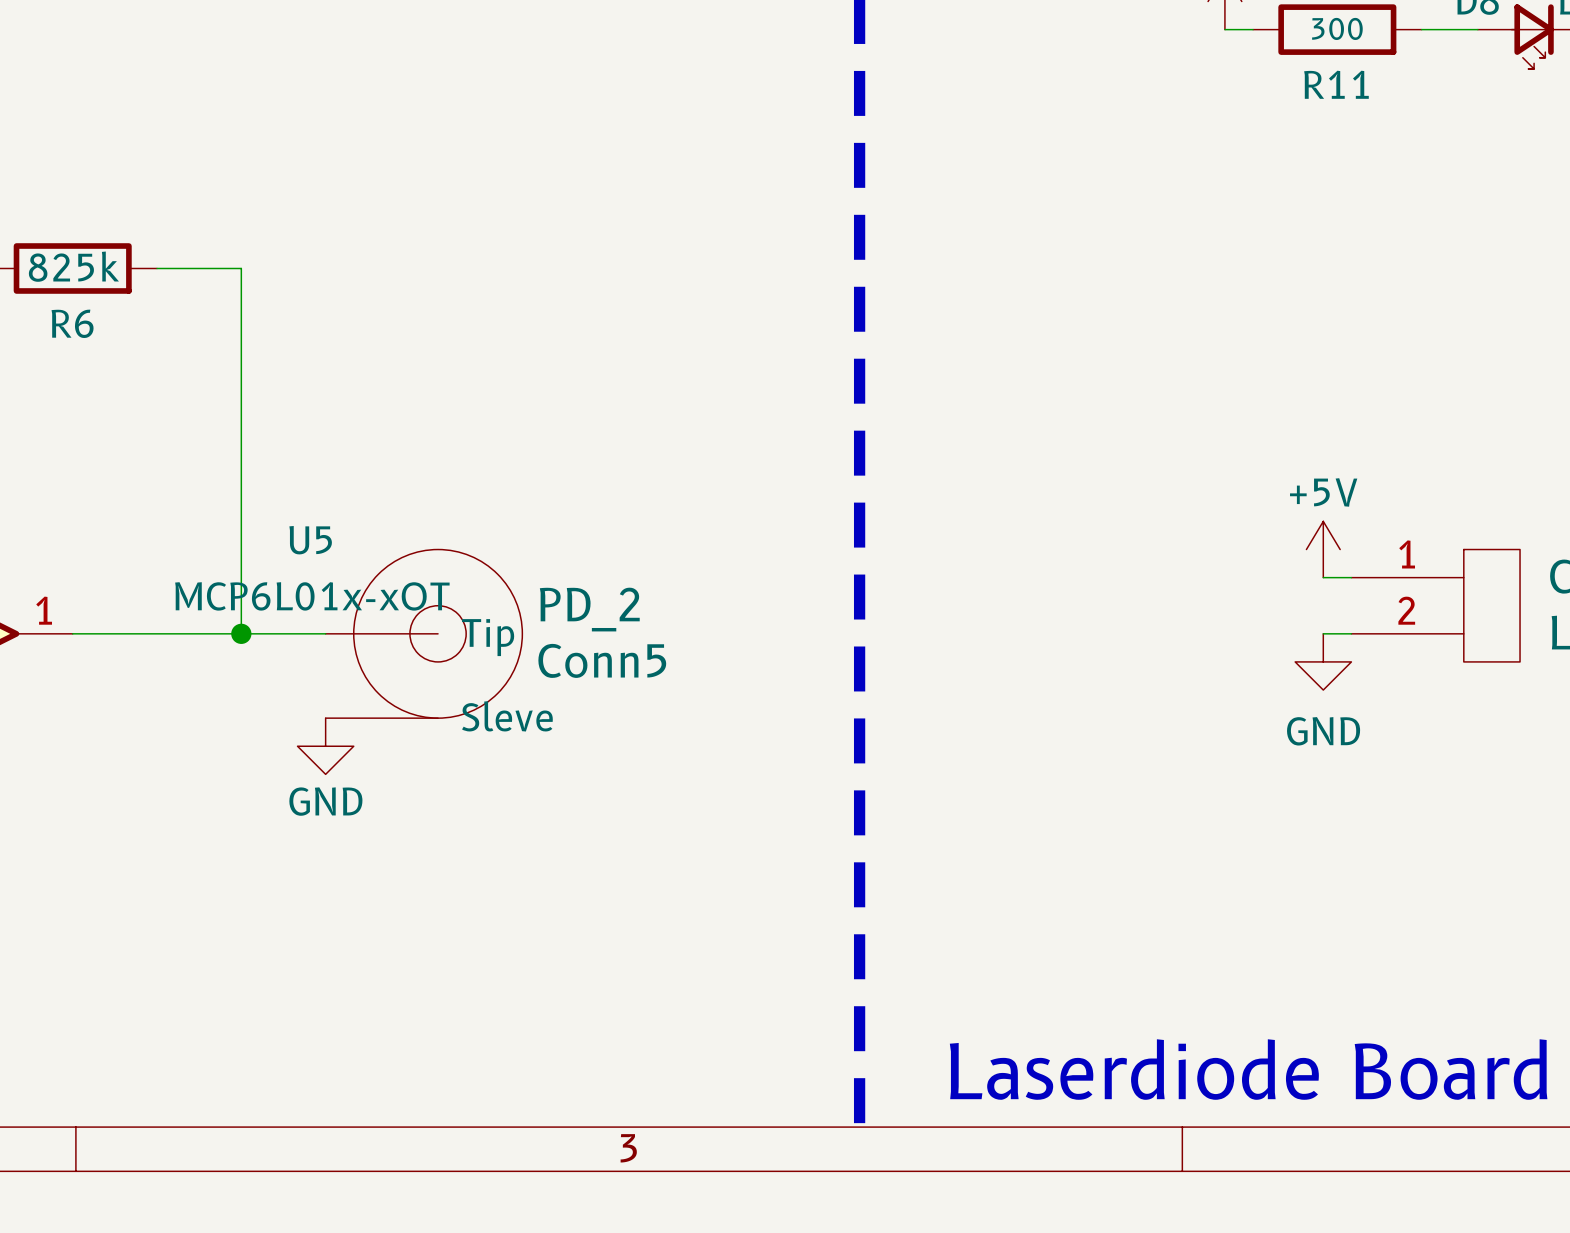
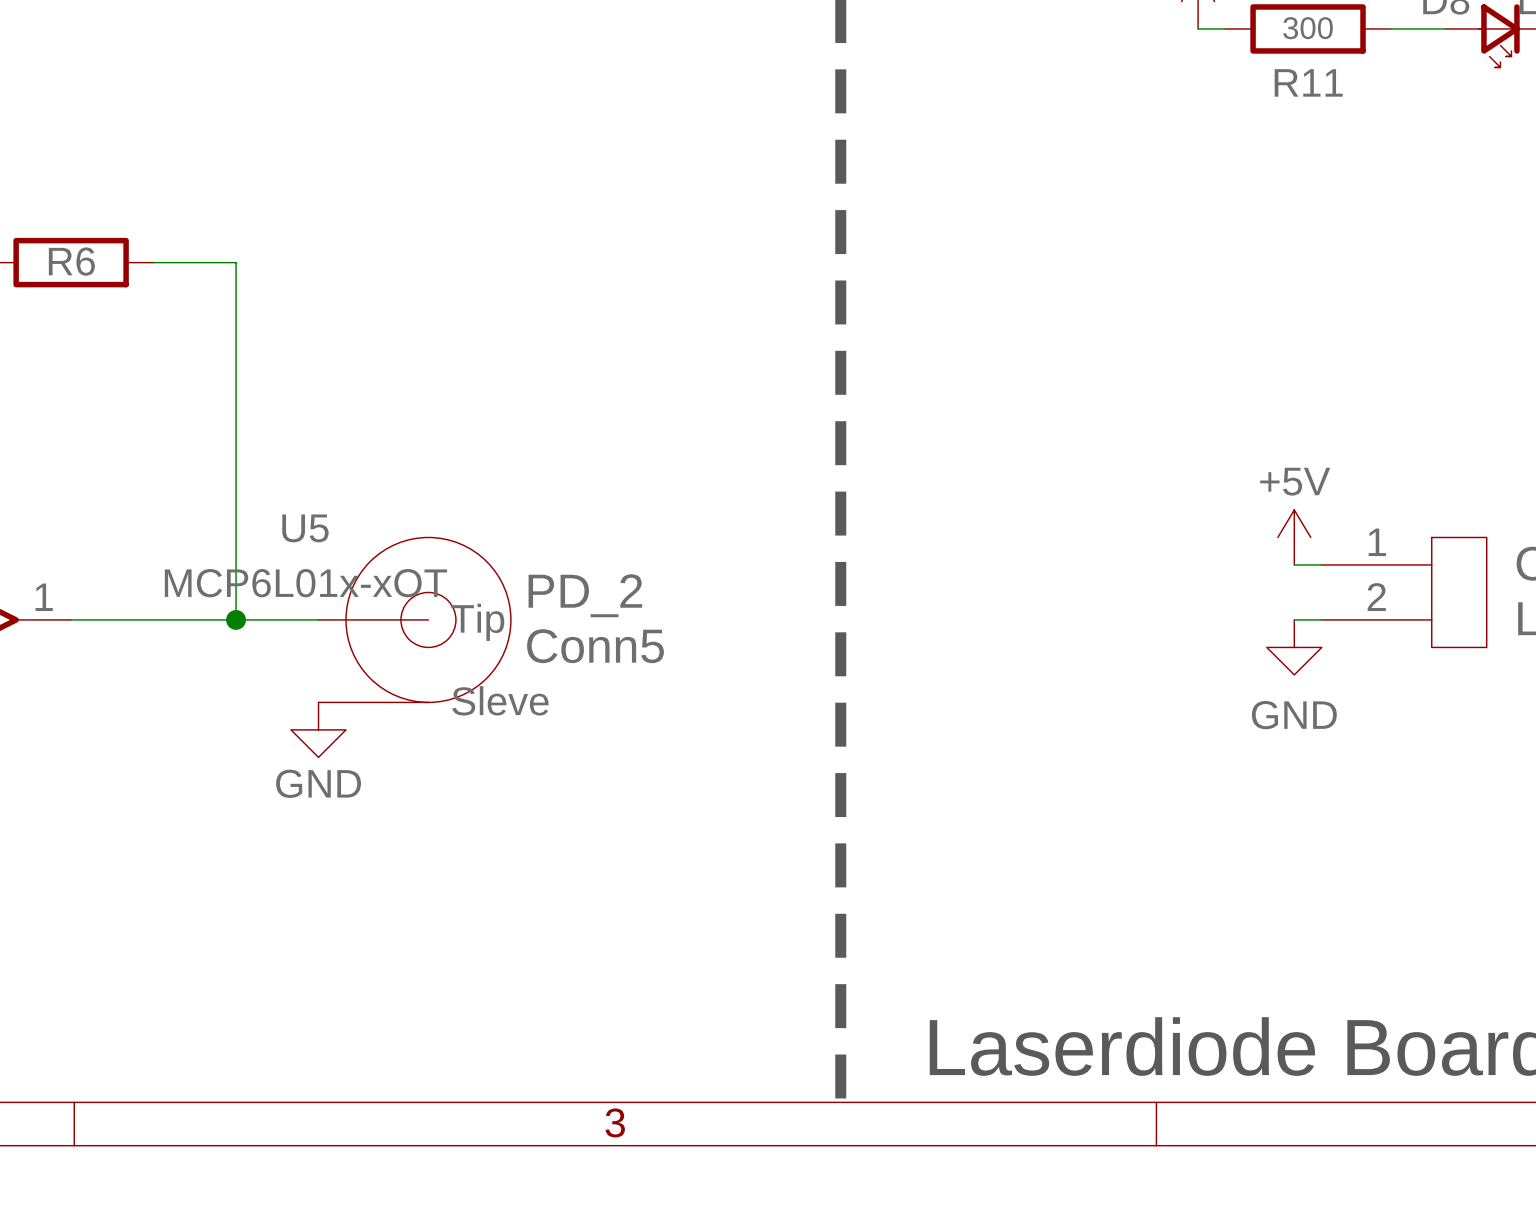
R6 value: 825k (73, 266) -> none
R6 name position: R6 (72, 323) -> R6 (71, 261)

